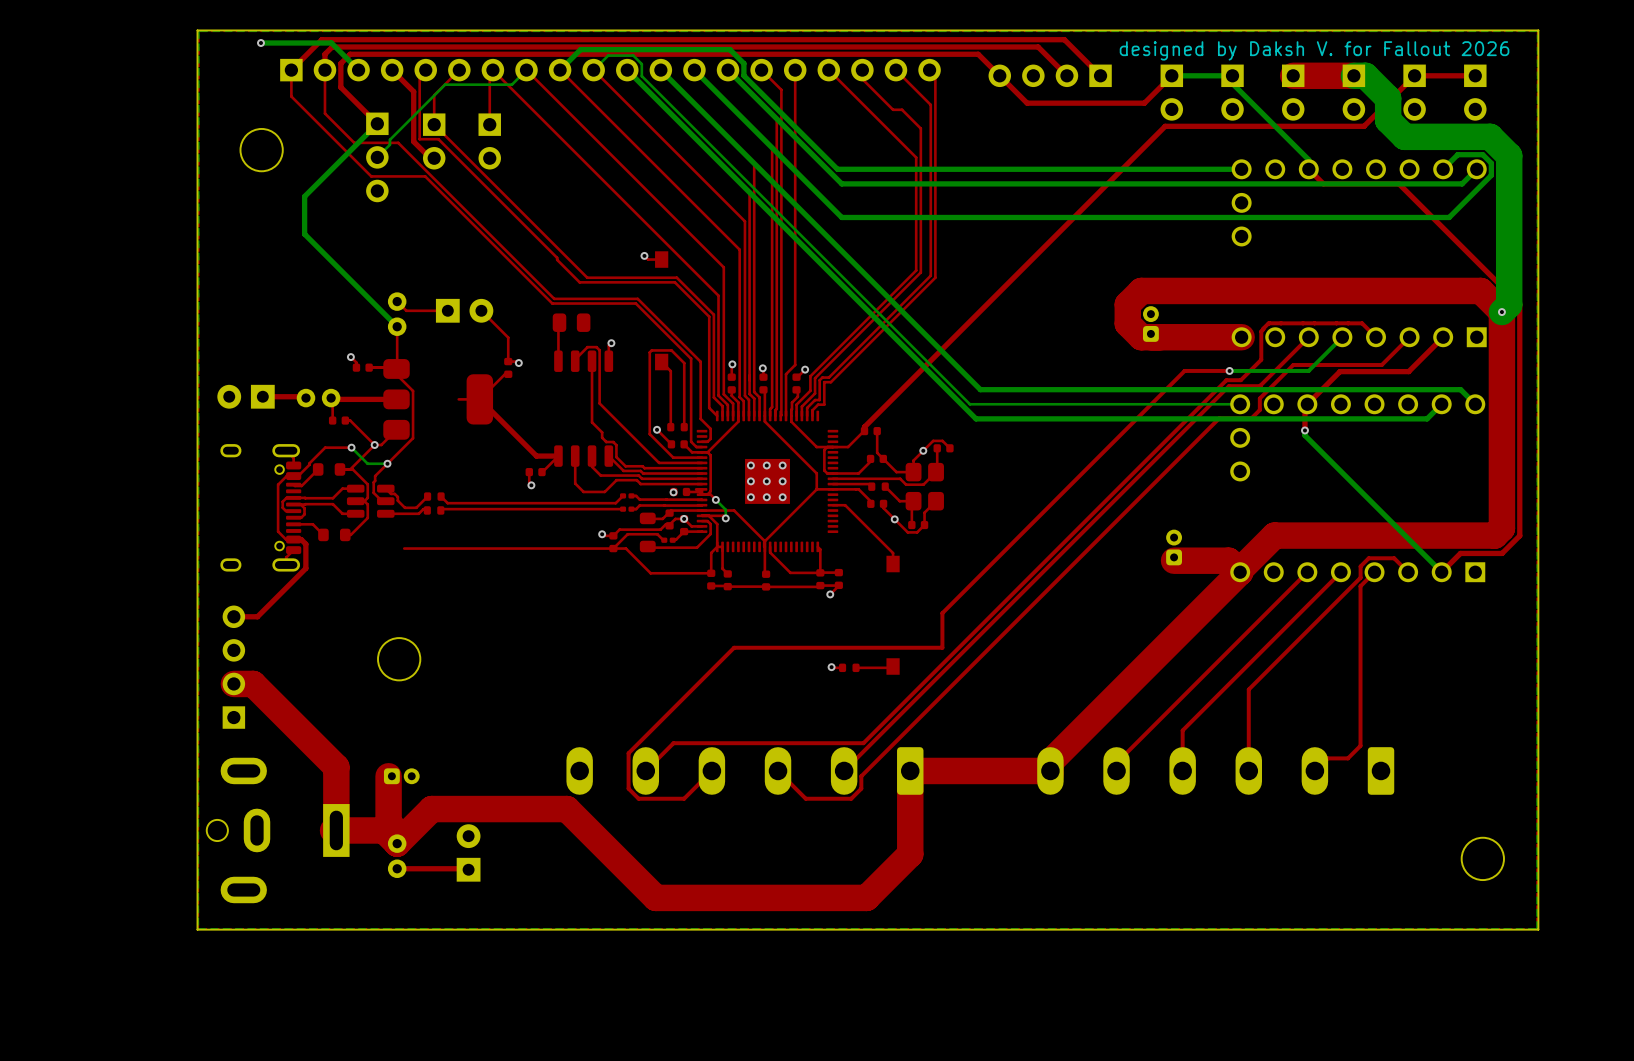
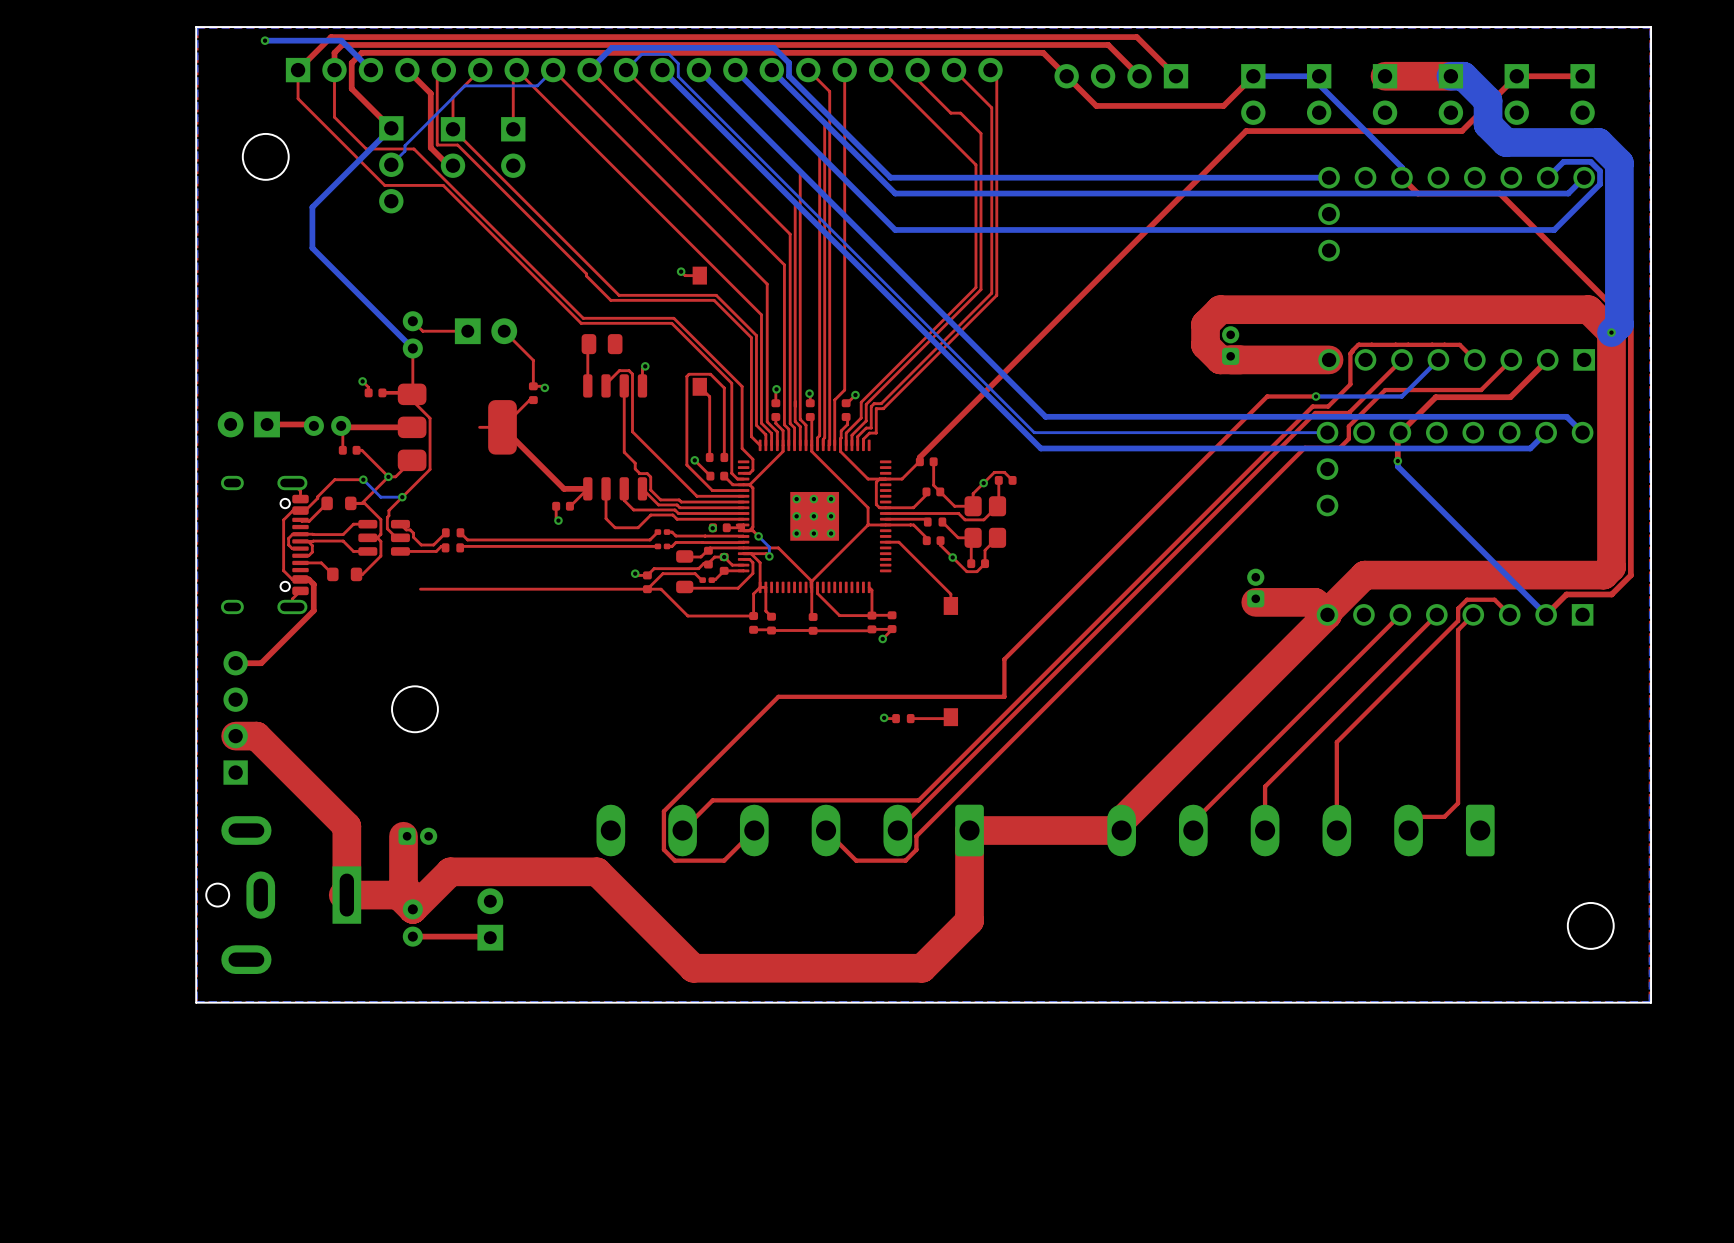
text: designed by Daksh V. for Fallout 2026 (1314, 50) -> none

